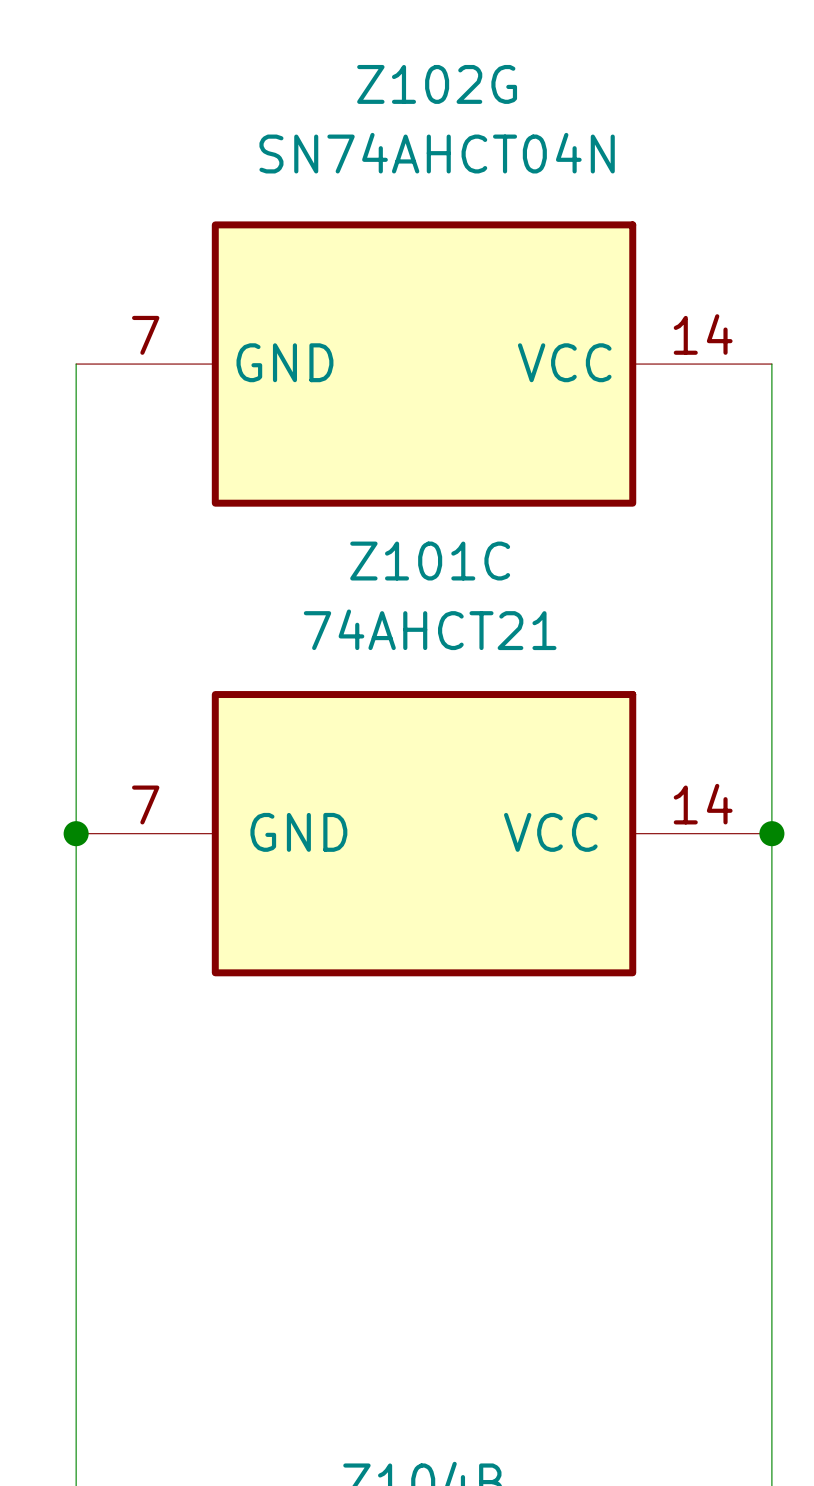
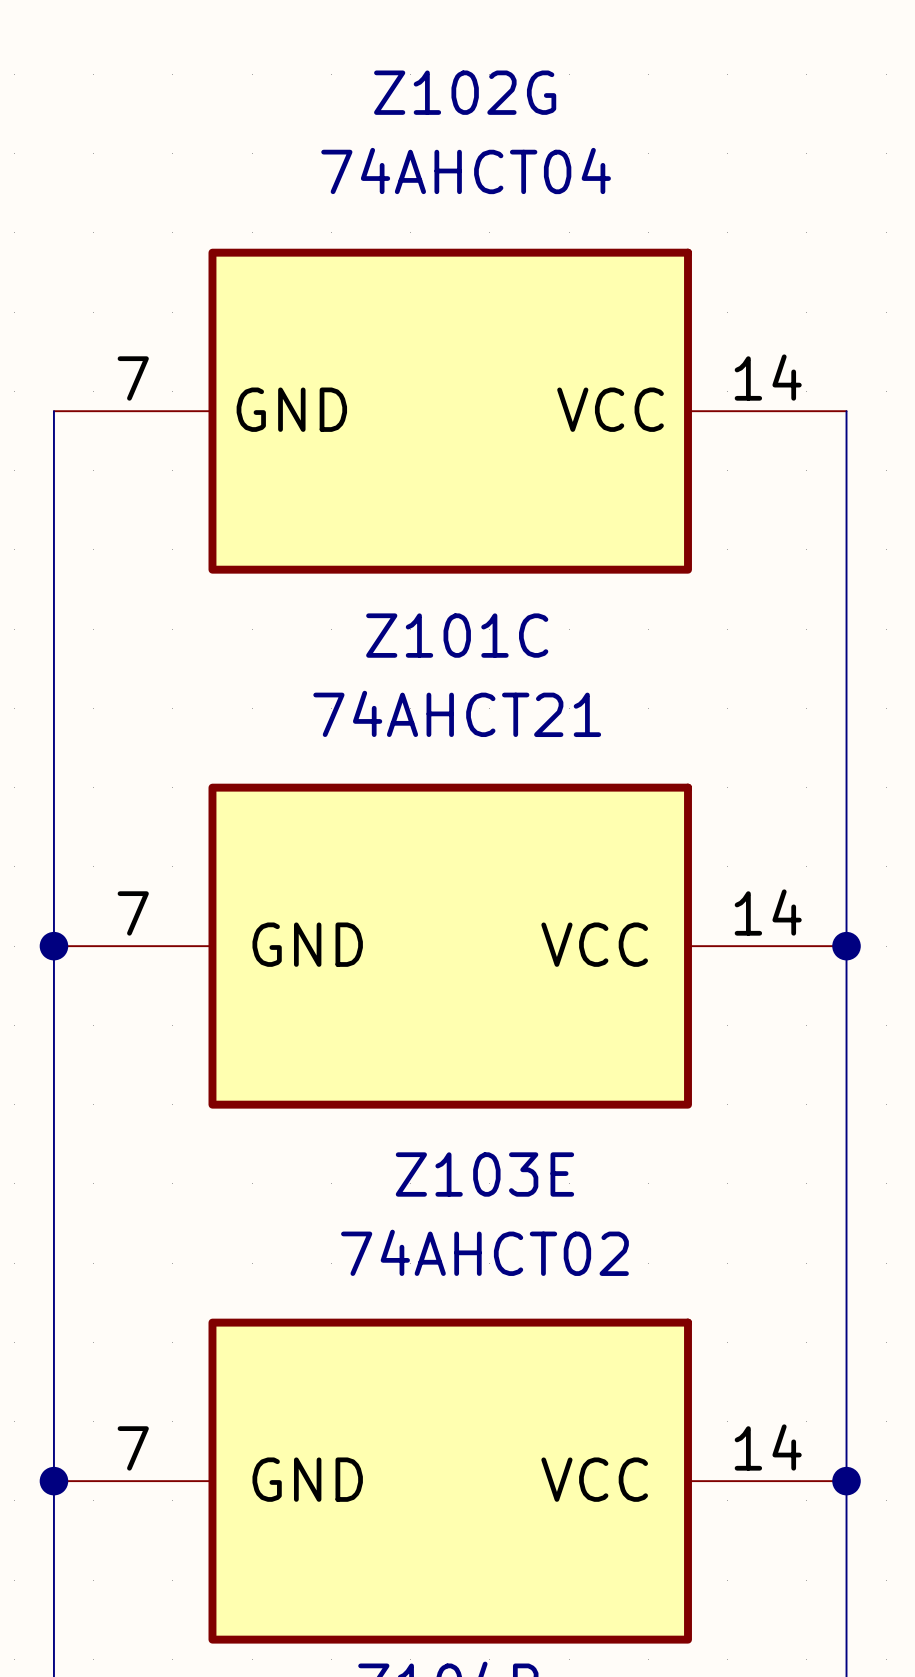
Z102G value: SN74AHCT04N (437, 153) -> 74AHCT04 (466, 170)
junction: none -> (53, 1481)
Z103E: none -> 74AHCT02 (450, 1481)
junction: none -> (846, 1481)

